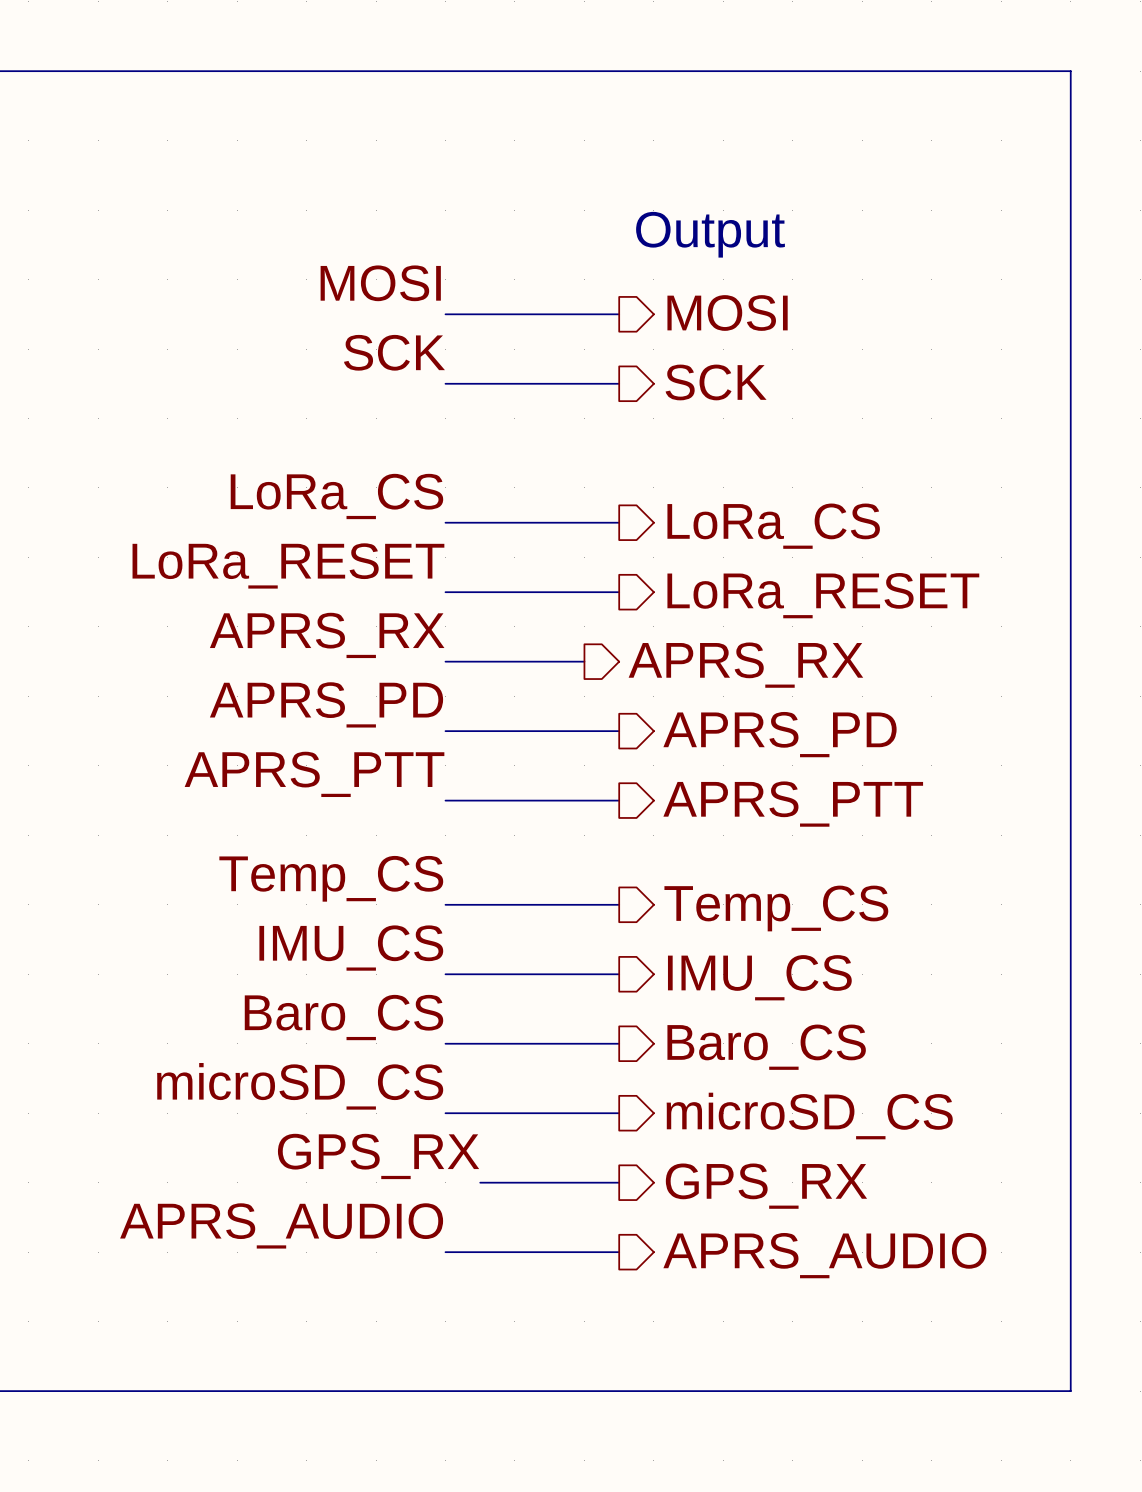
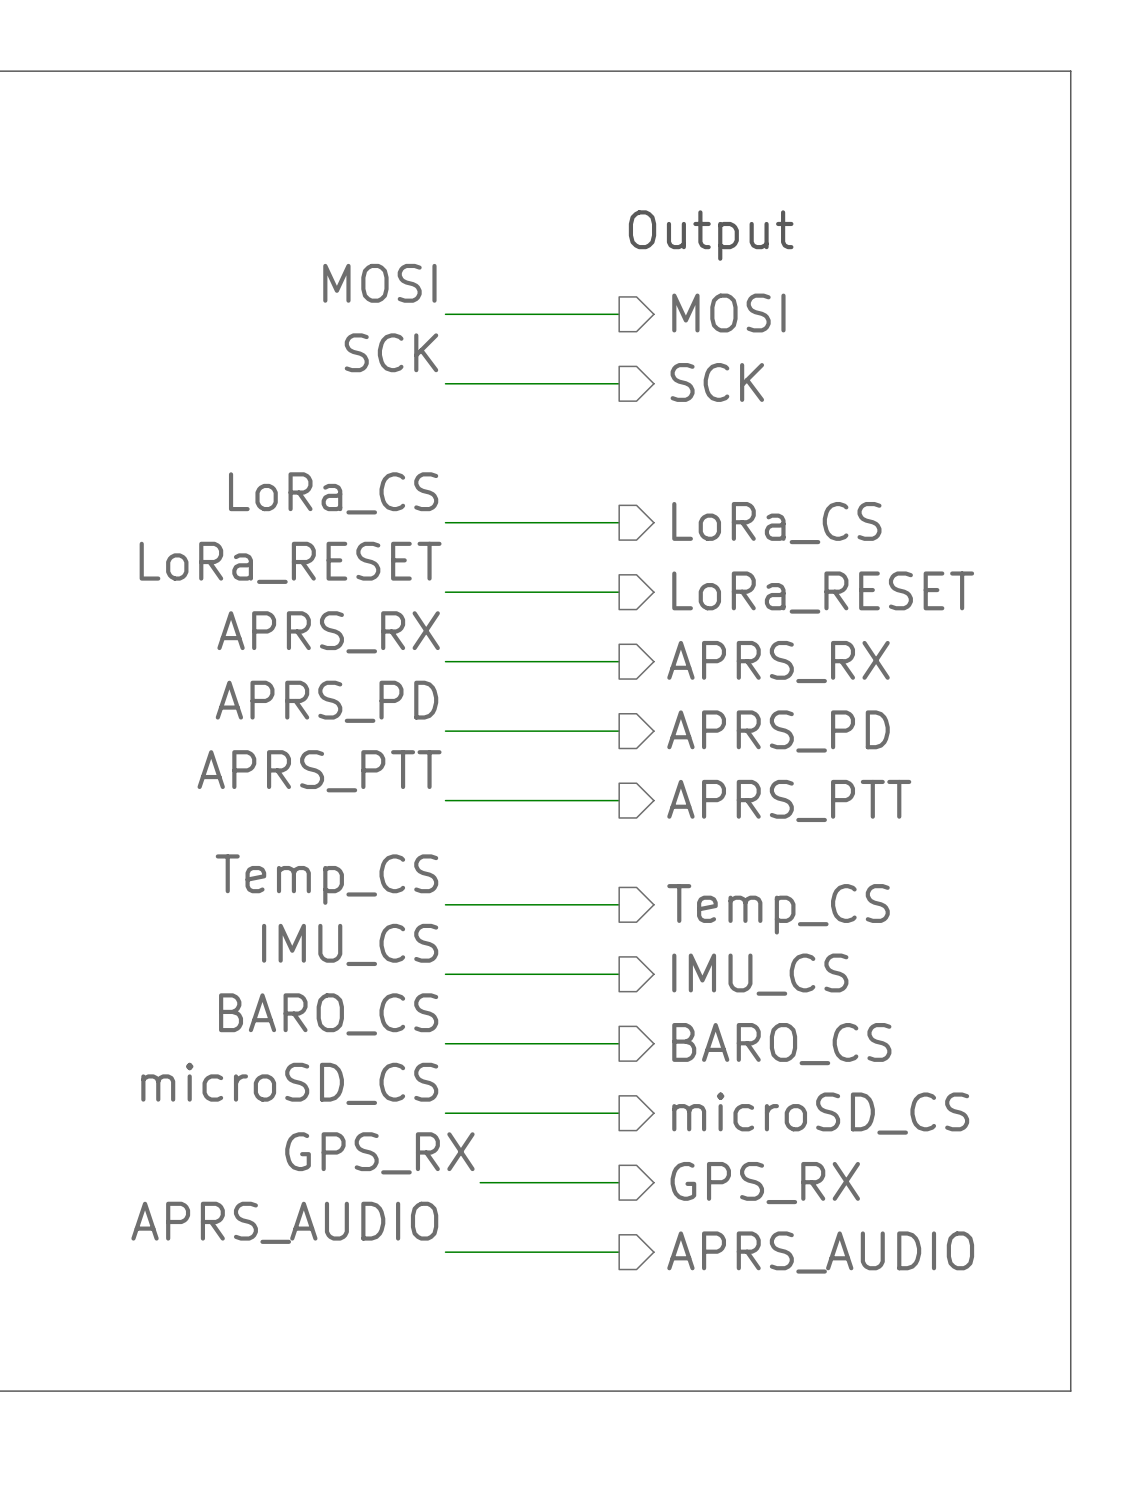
wire: none -> (584, 661) (619, 661)
hierarchical label position: APRS_RX (745, 665) -> APRS_RX (778, 662)
label: Baro_CS (343, 1017) -> BARO_CS (328, 1014)
hierarchical label: Baro_CS (766, 1047) -> BARO_CS (781, 1044)

